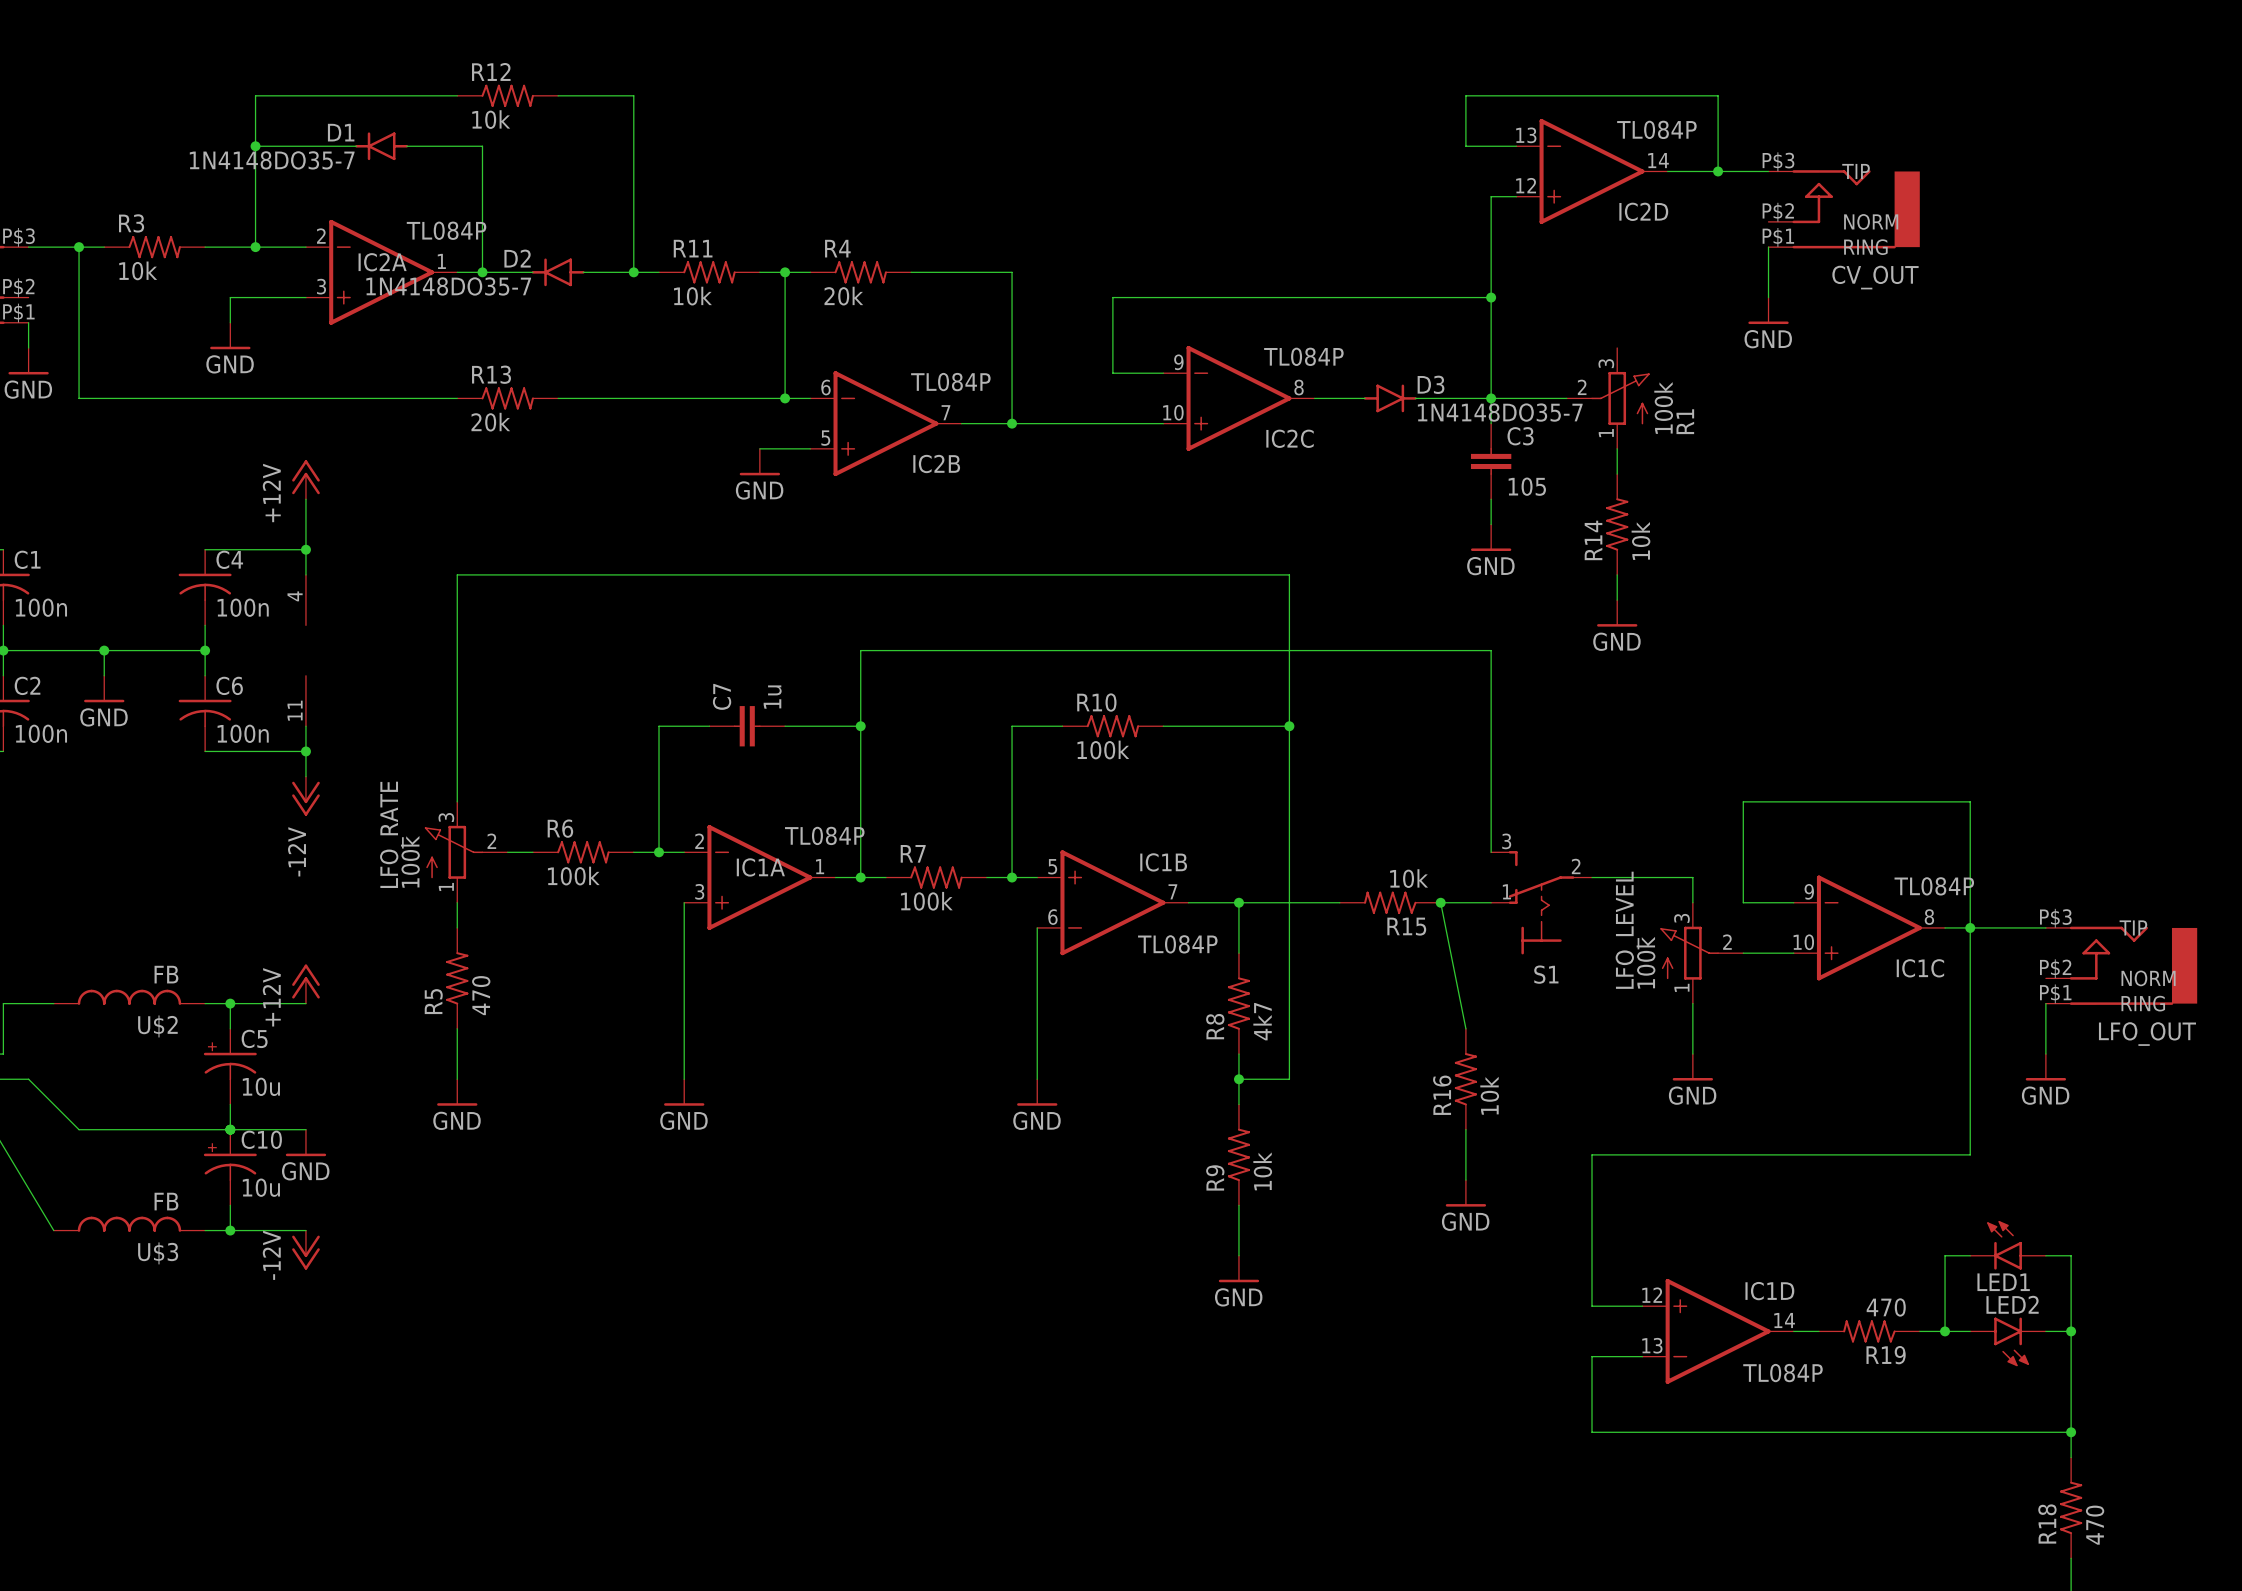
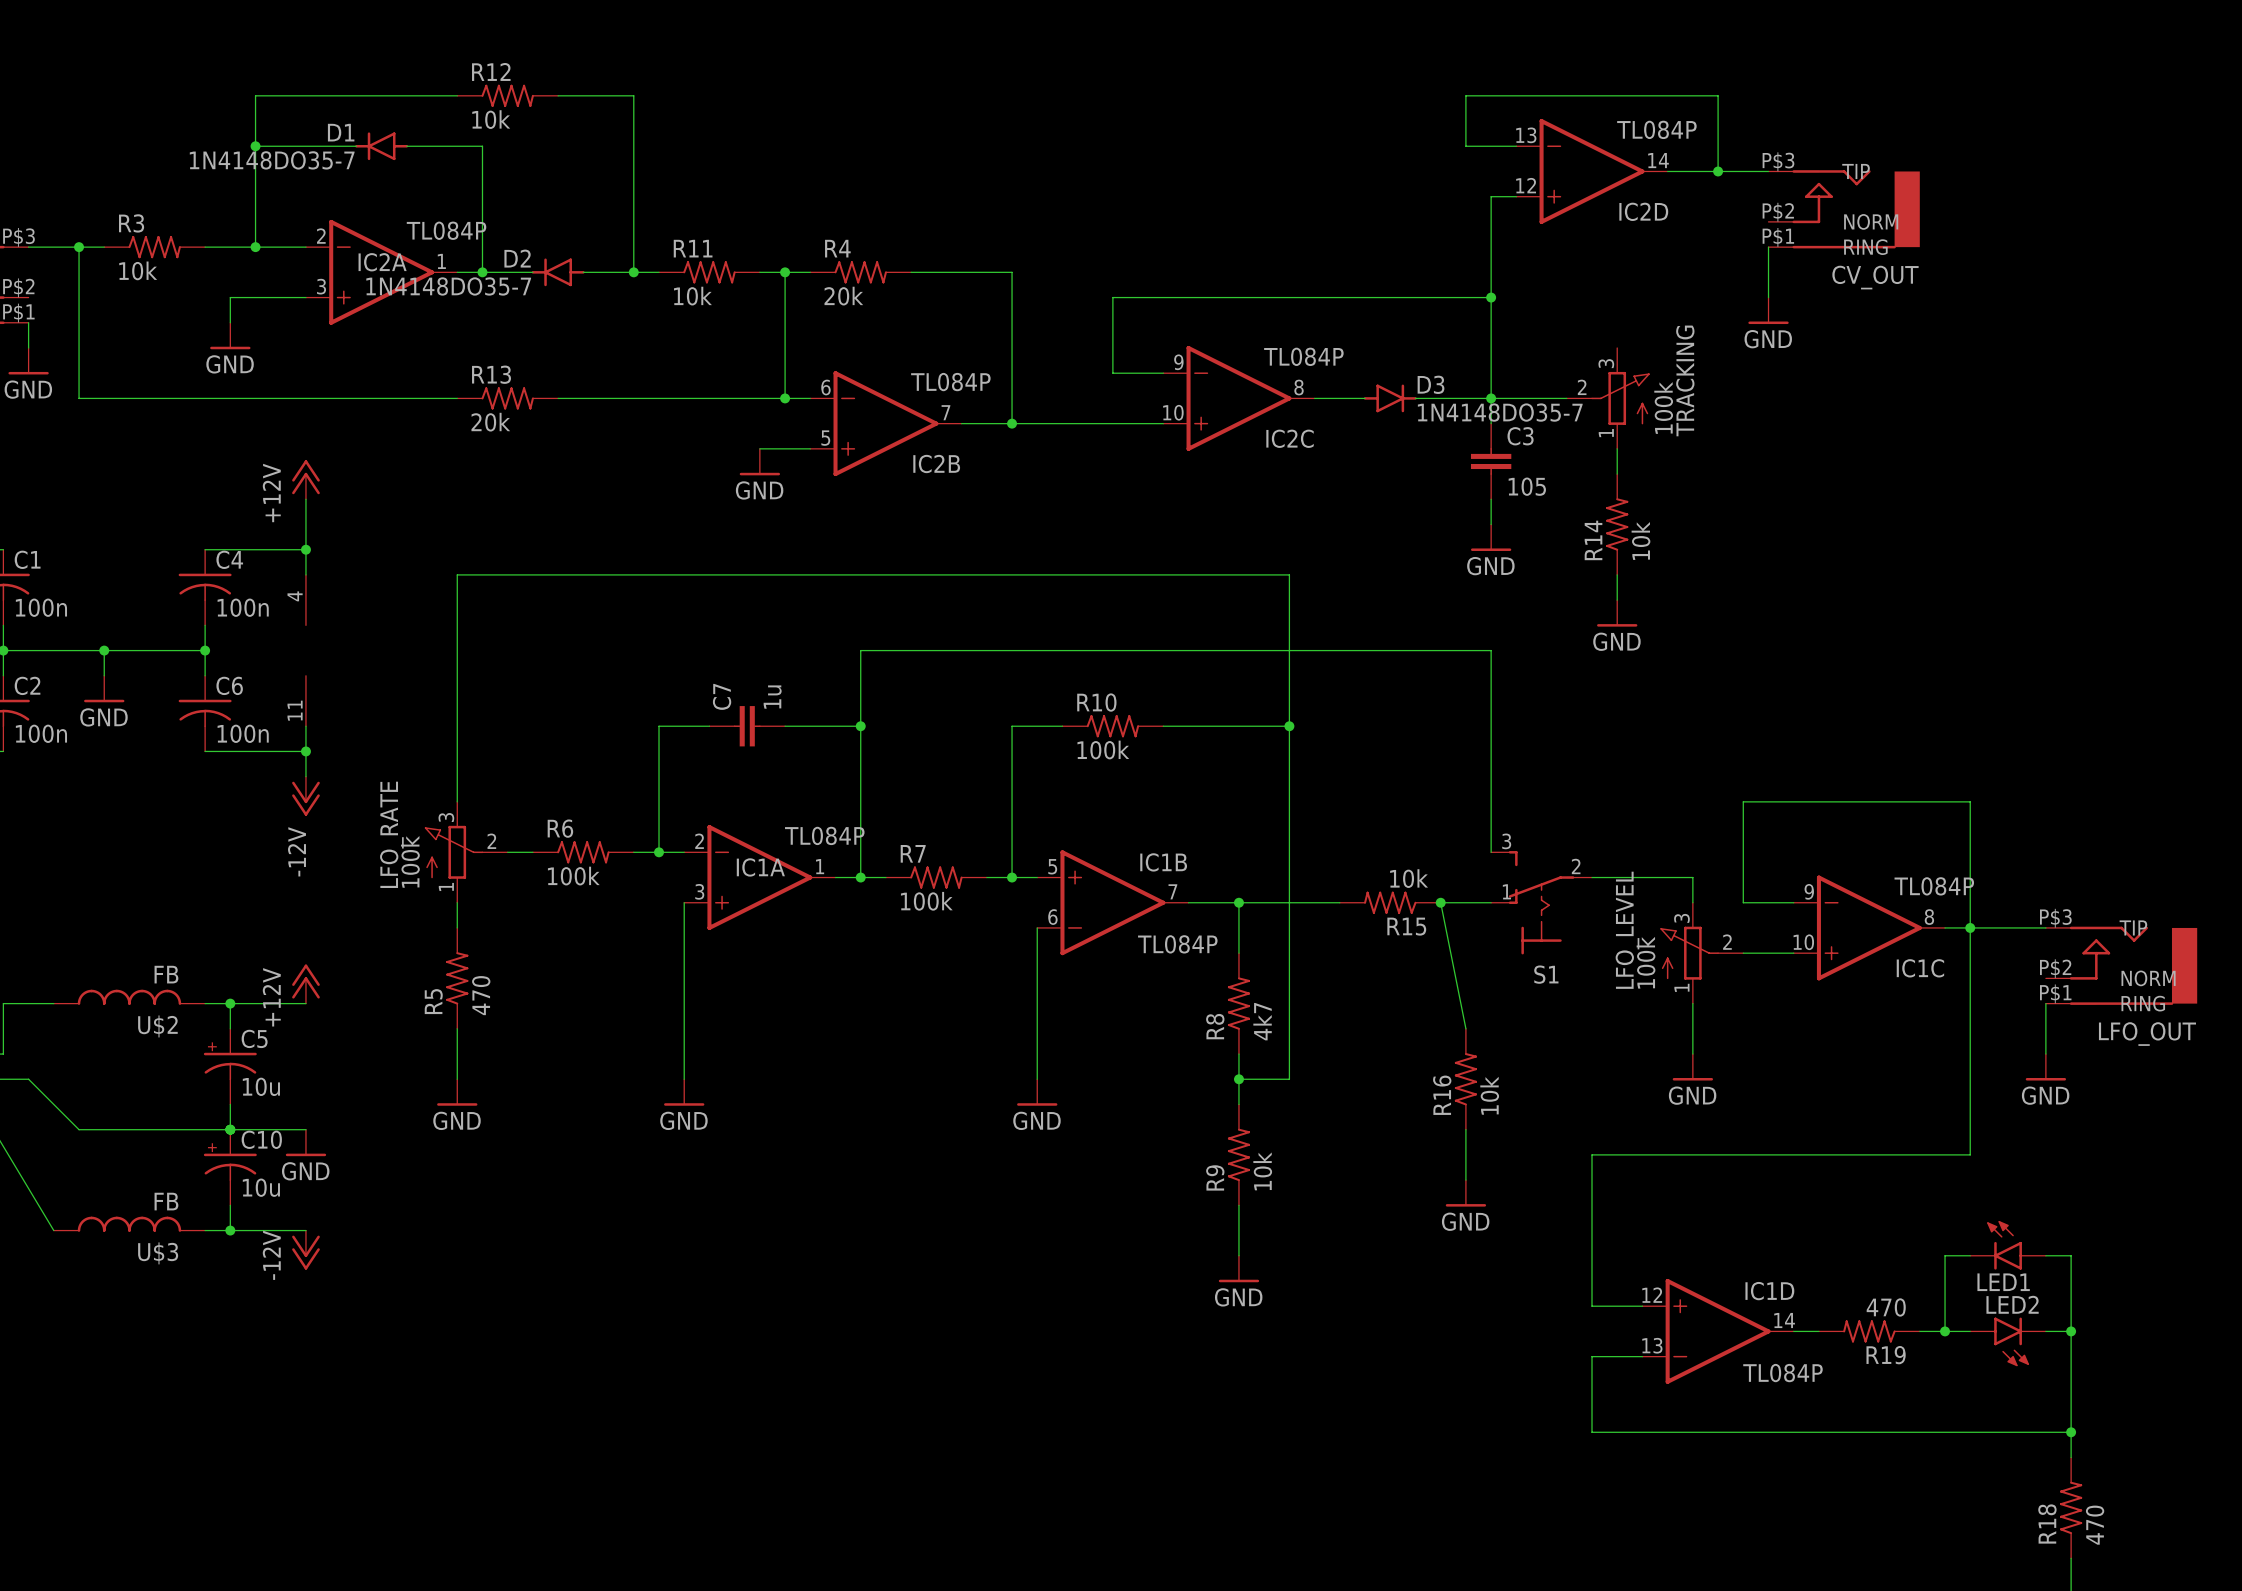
R1 name: R1 (1685, 421) -> TRACKING (1685, 380)

